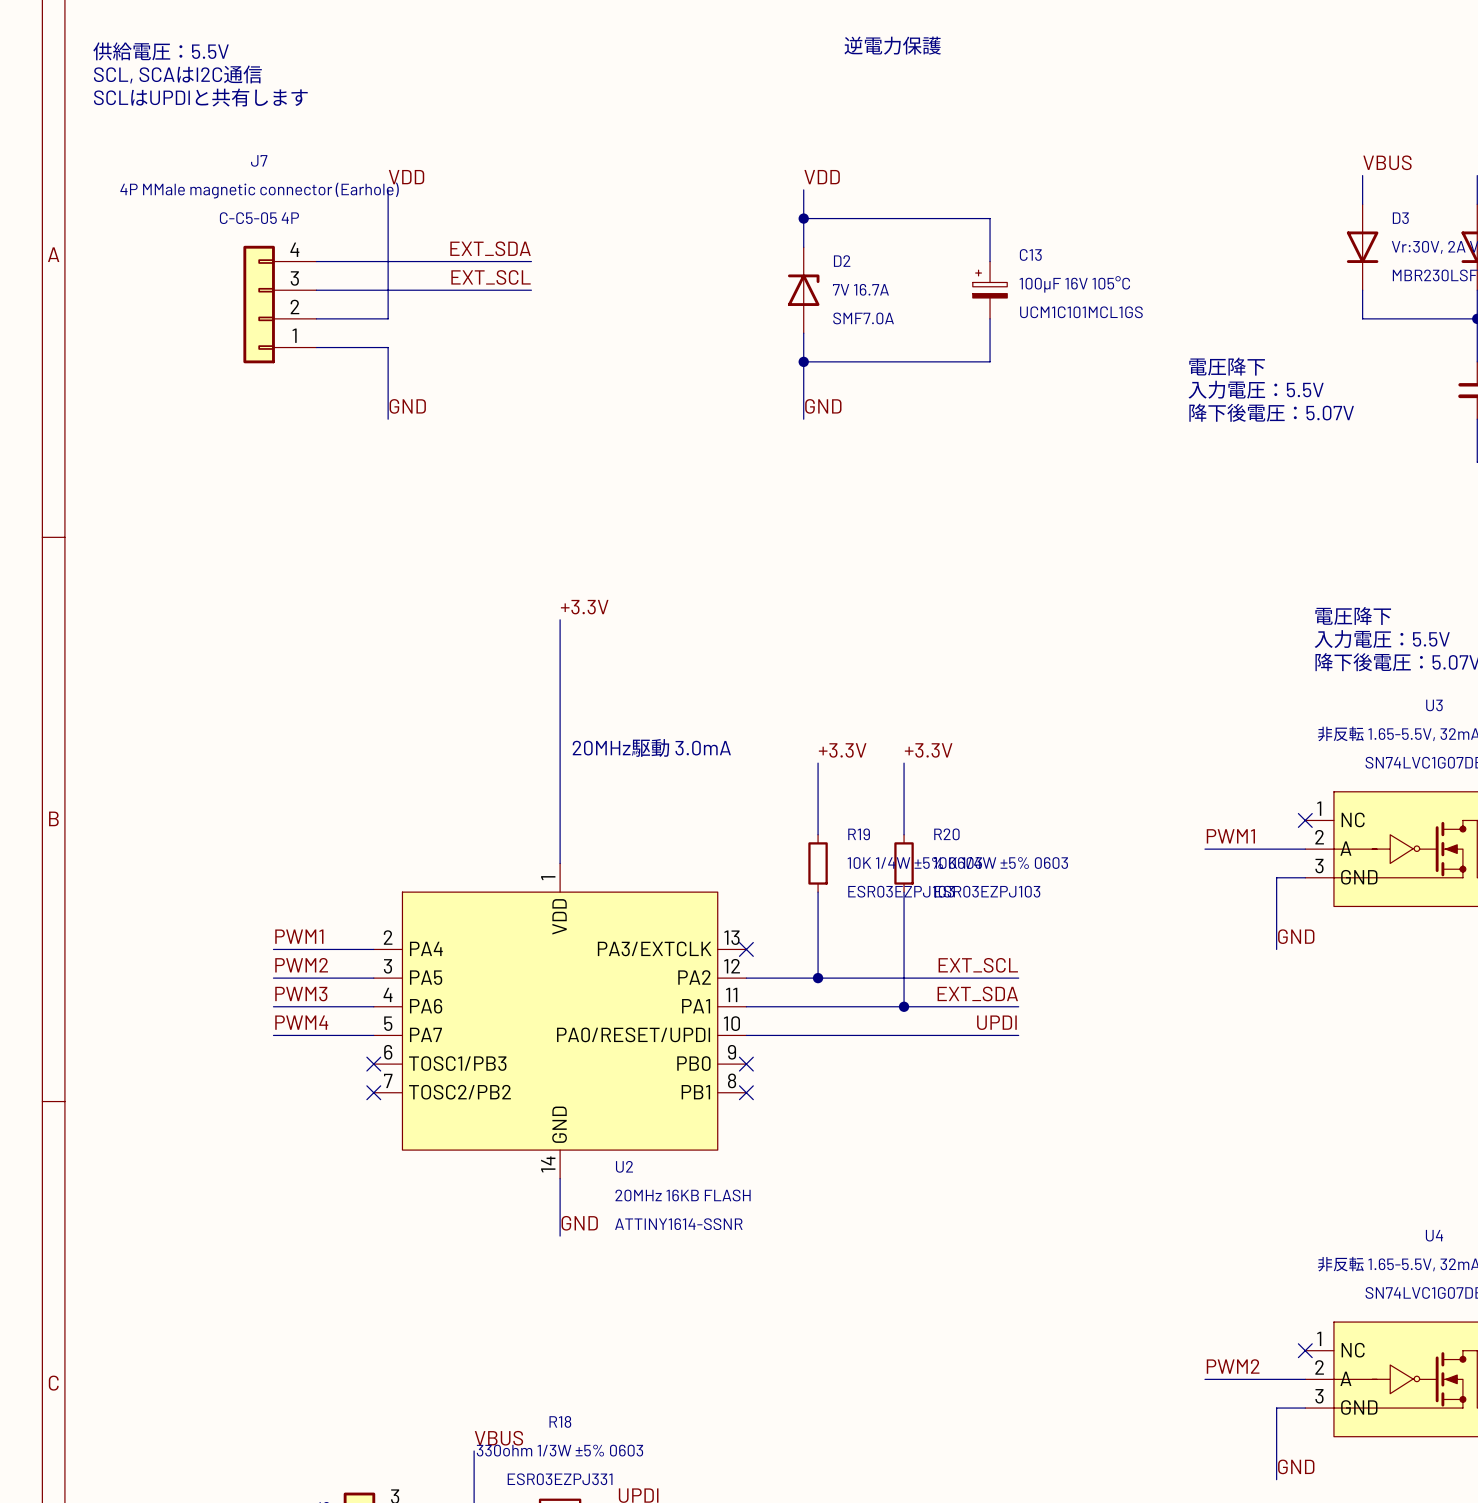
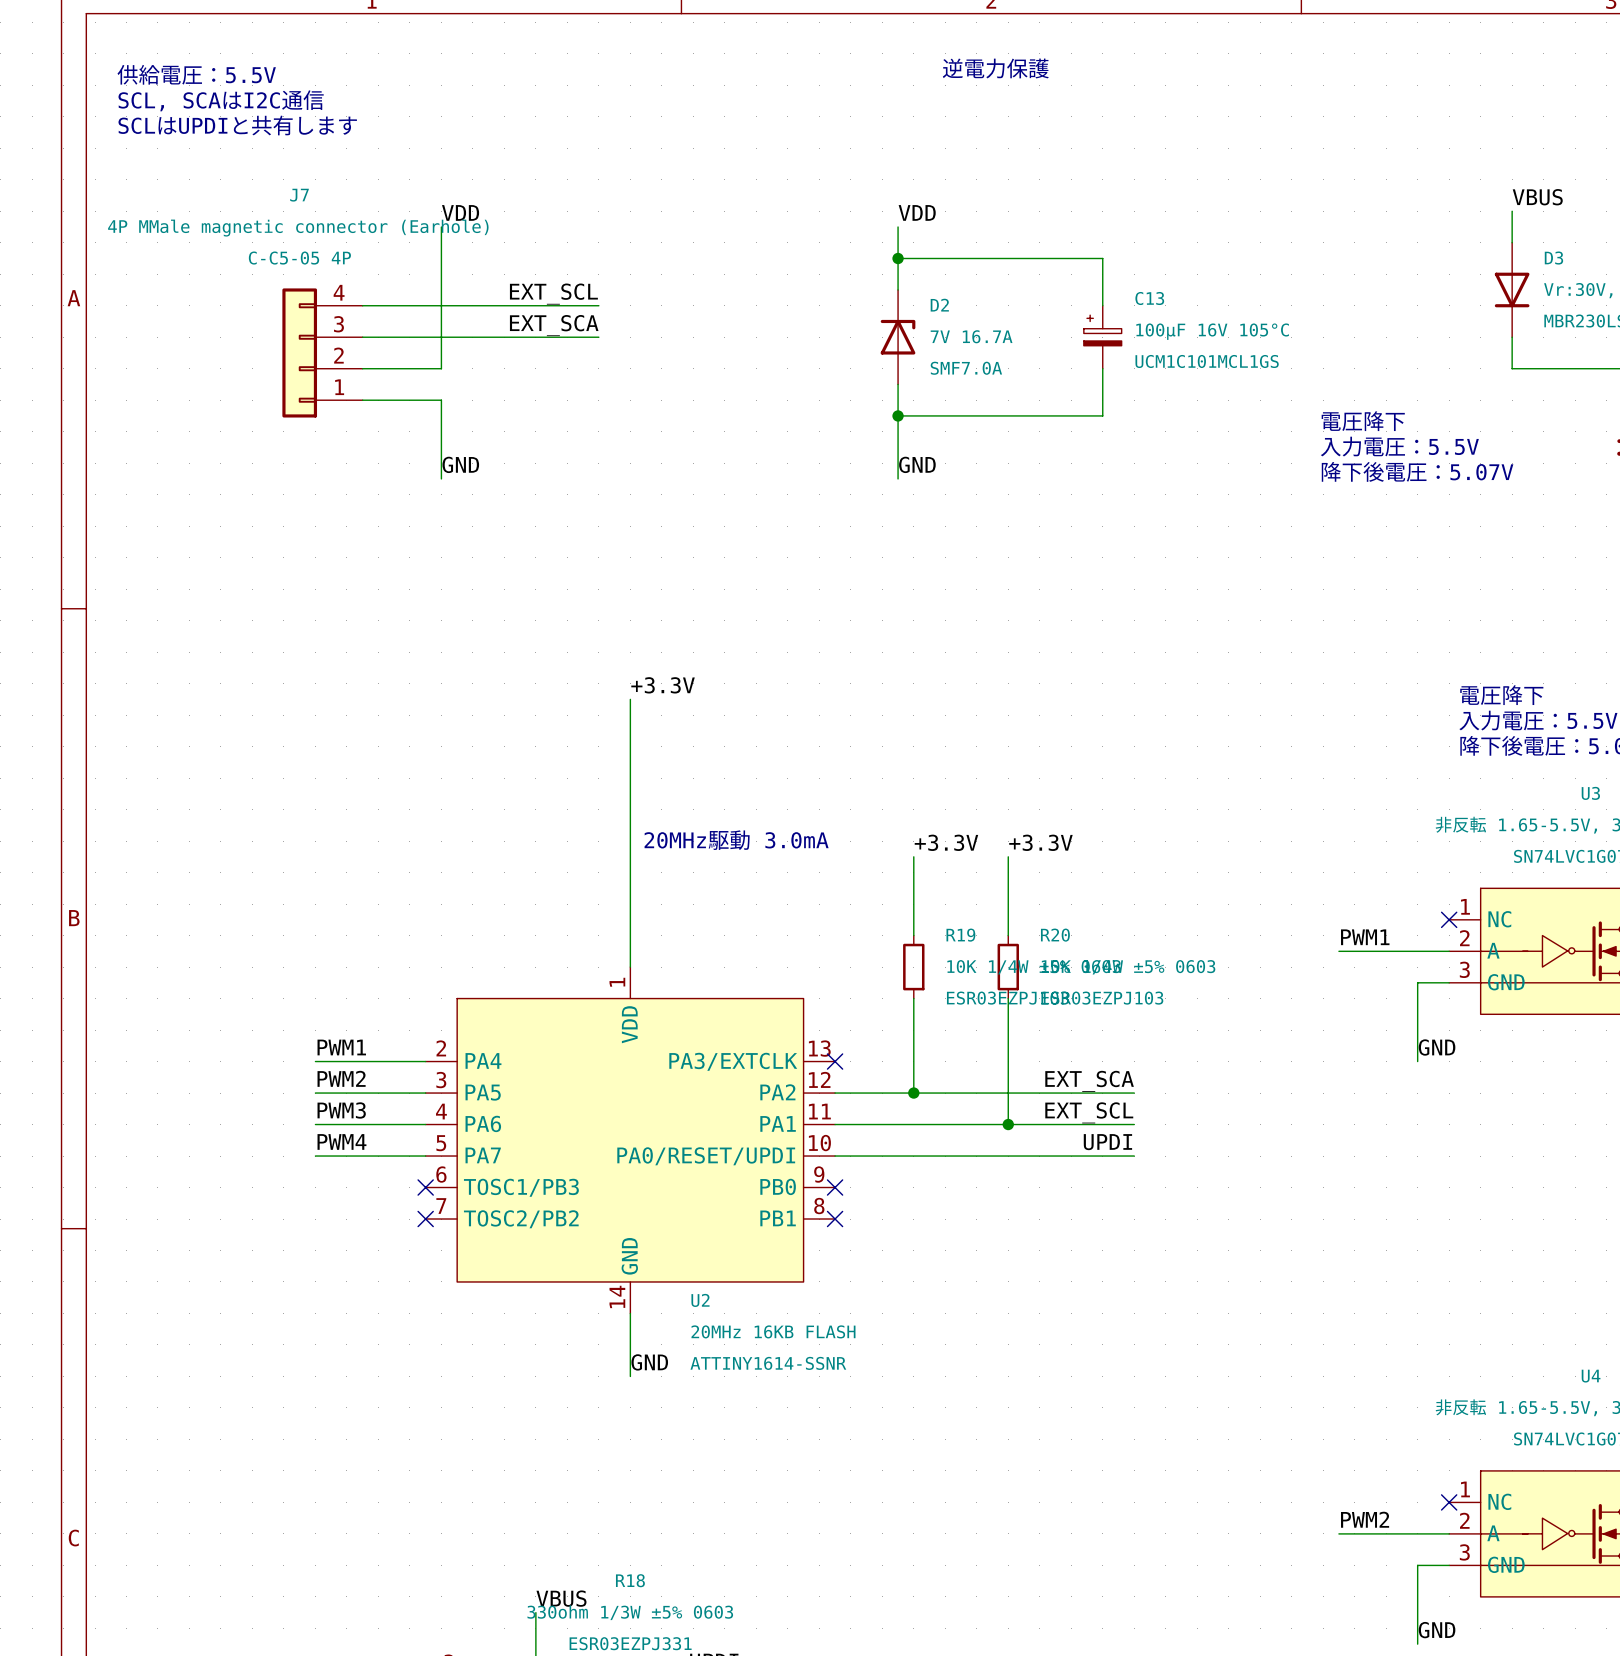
label: EXT_SDA (490, 248) -> EXT_SCL (553, 294)
label: EXT_SCL (491, 277) -> EXT_SCA (554, 325)
label: EXT_SCL (978, 965) -> EXT_SCA (1089, 1081)
label: EXT_SDA (977, 993) -> EXT_SCL (1089, 1112)

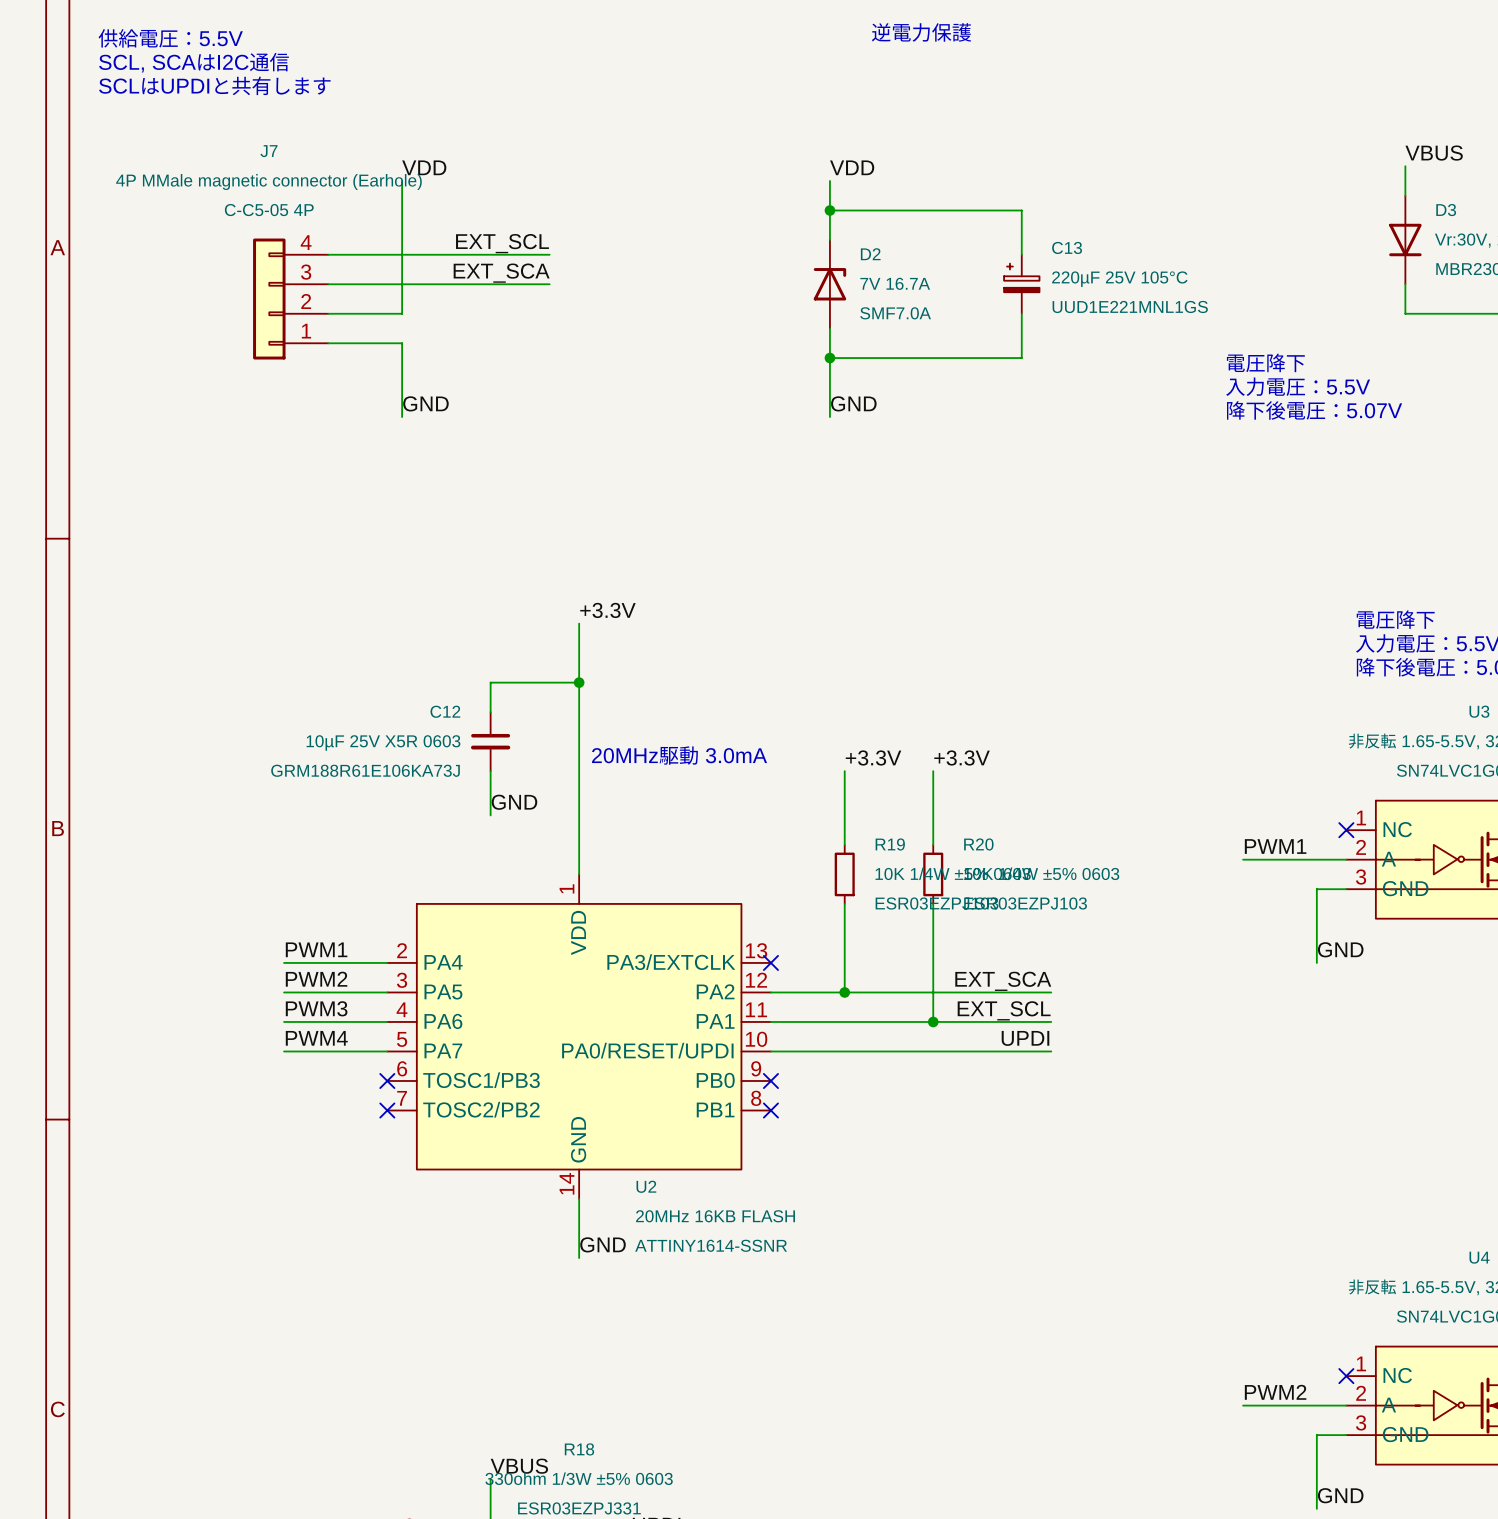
C13 value: 100µF 16V 105°C (1212, 331) -> 220µF 25V 105°C (1119, 279)
C13 text: UCM1C101MCL1GS (1207, 361) -> UUD1E221MNL1GS (1130, 306)
wire: none -> (579, 682) (490, 682) (490, 712)
junction: none -> (579, 682)
C12: none -> 10µF 25V X5R 0603 (490, 741)
wire: none -> (490, 771) (490, 815)
label: none -> GND (514, 802)

